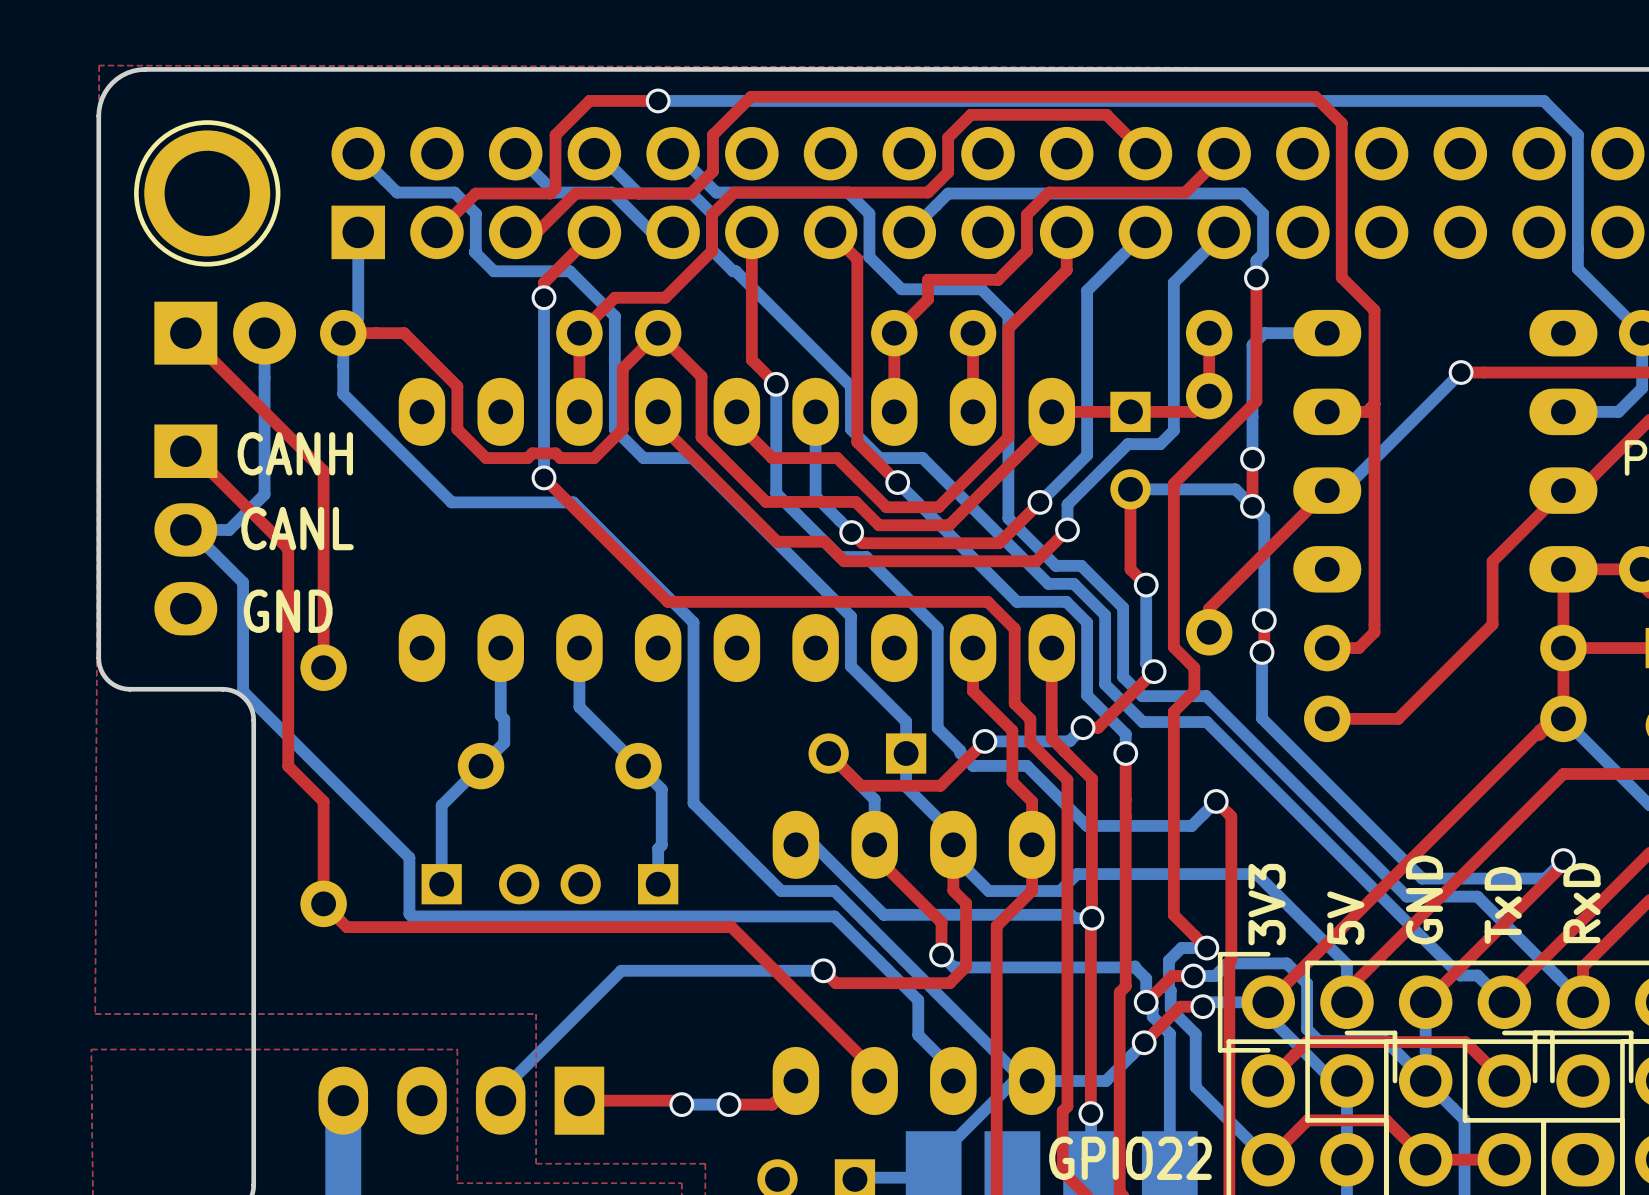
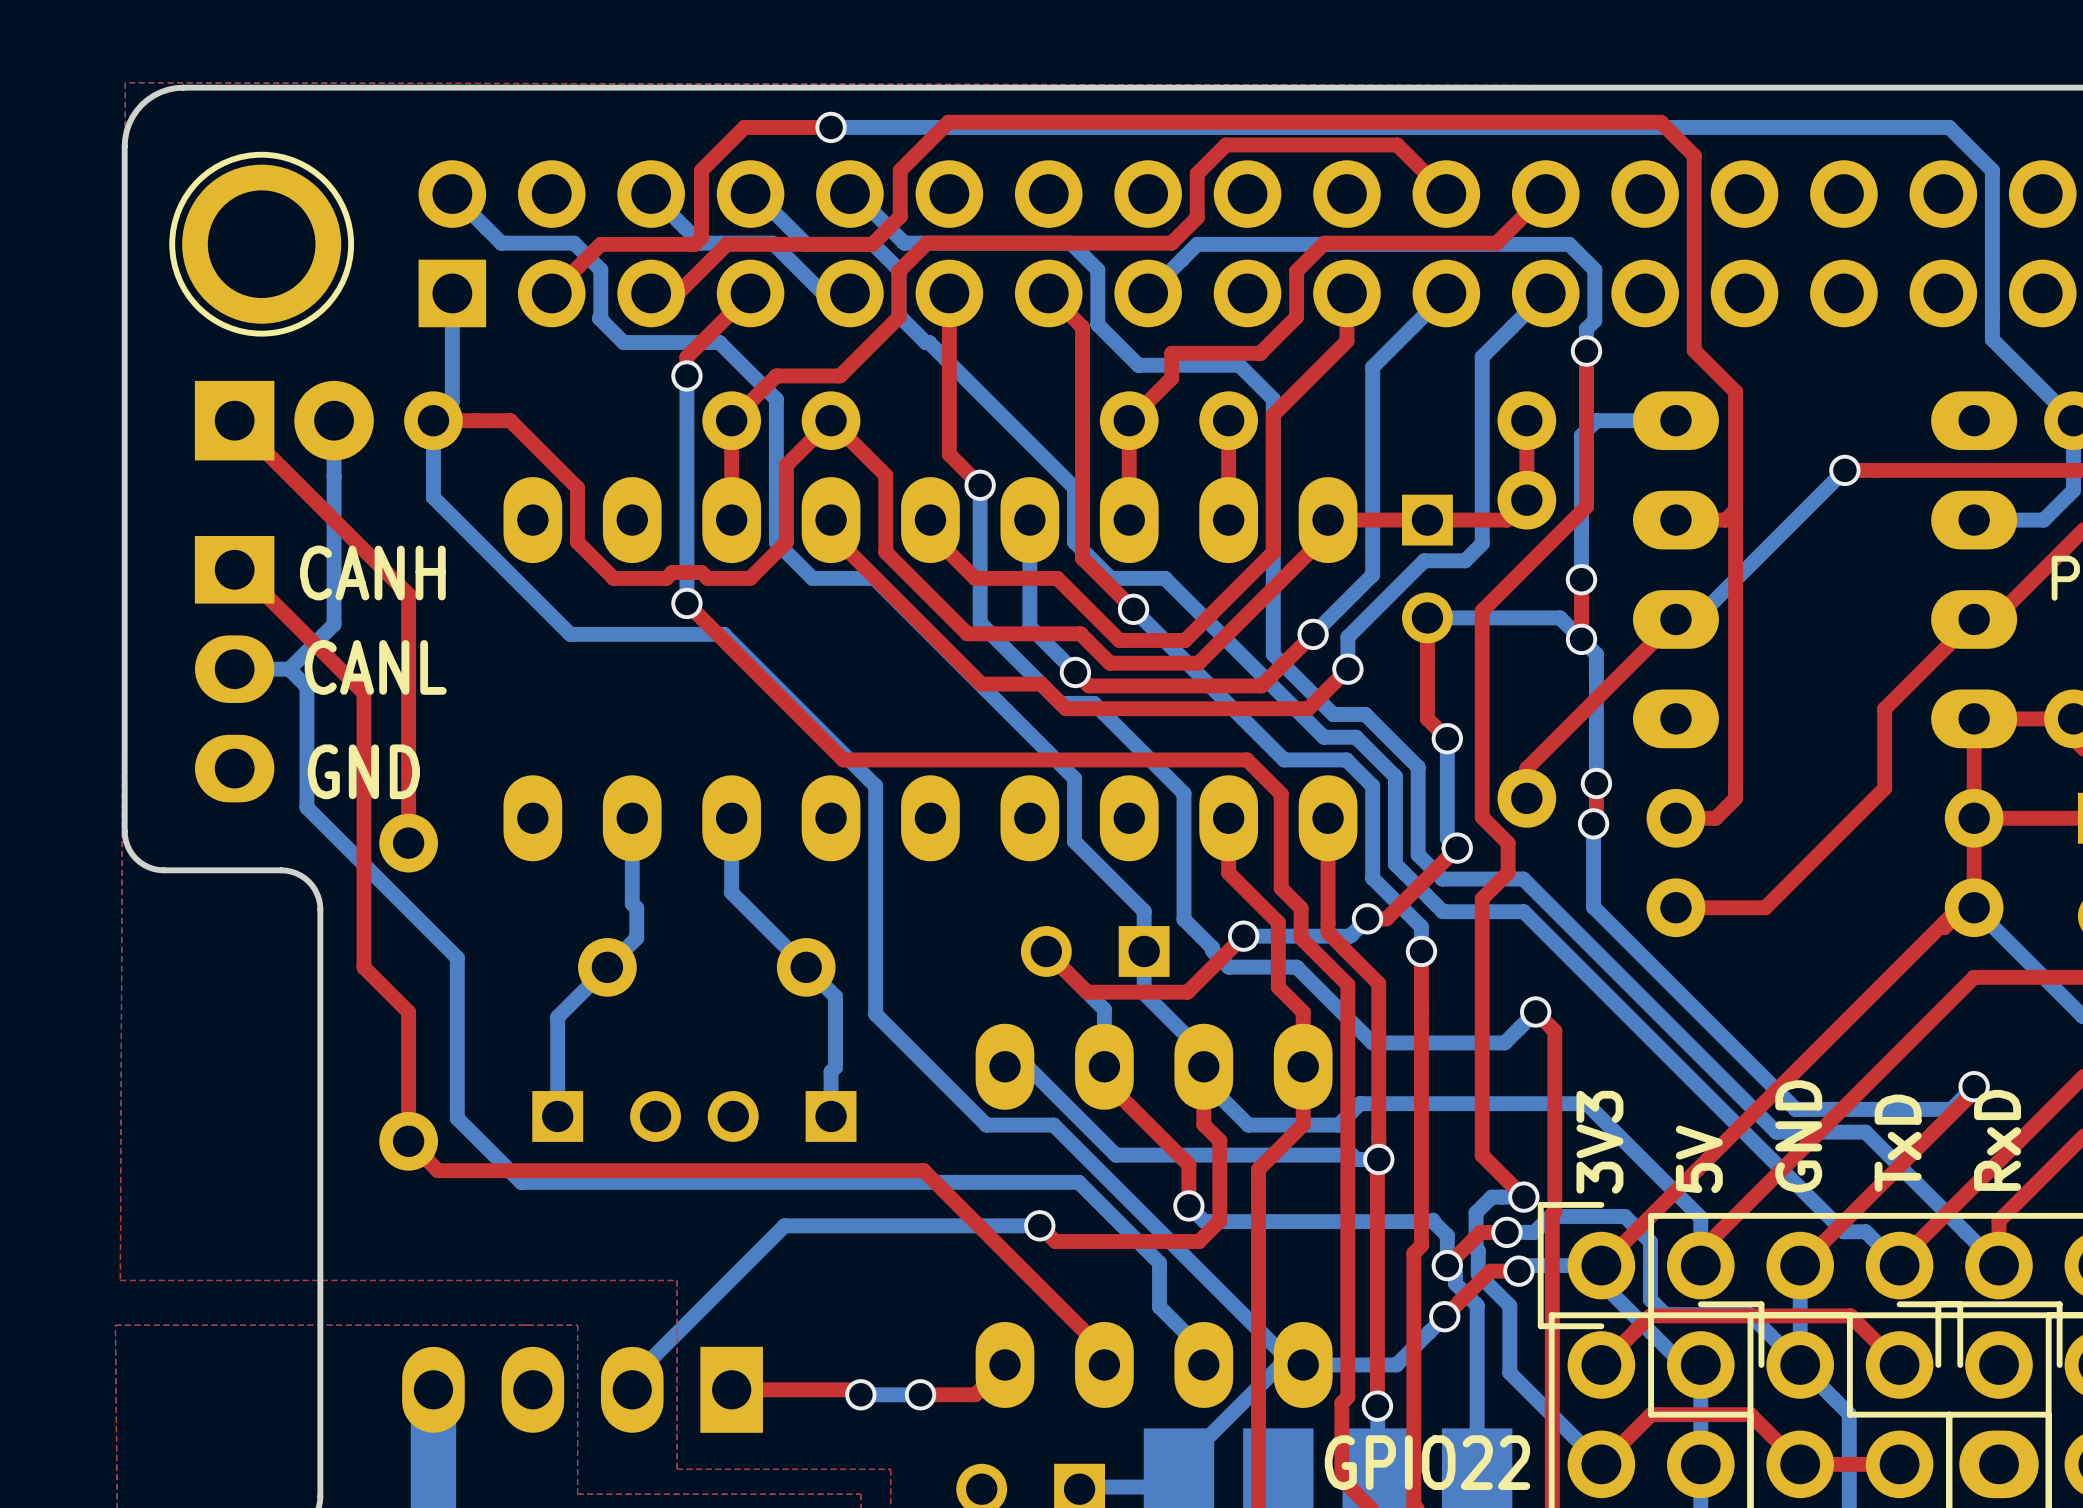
bottom track: (190, 529) (243, 582) -> (289, 669) (306, 686) (306, 735)
bottom track: (243, 639) (243, 691) (409, 857) (409, 914) (411, 916) (834, 916) (854, 936) -> (306, 807) (457, 957) (457, 1118) (521, 1182) (1078, 1182)

